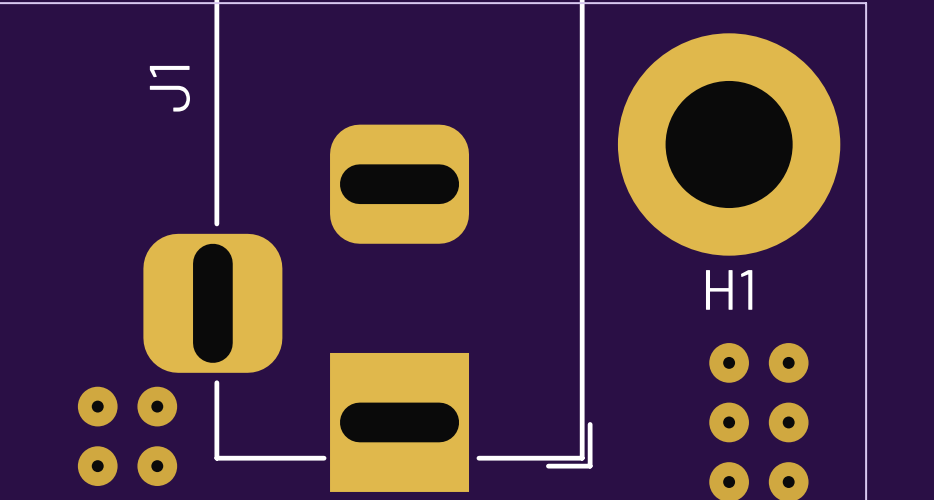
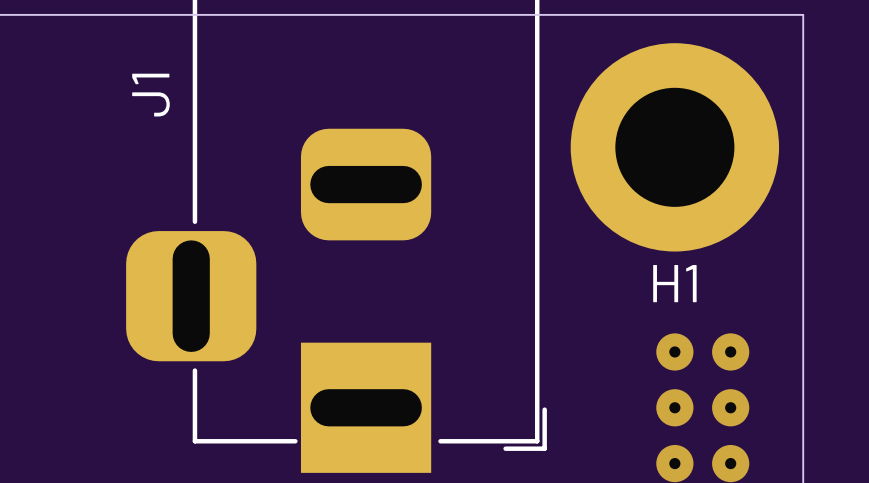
via: (97, 406) -> none
via: (157, 406) -> none
via: (97, 466) -> none
via: (157, 466) -> none

